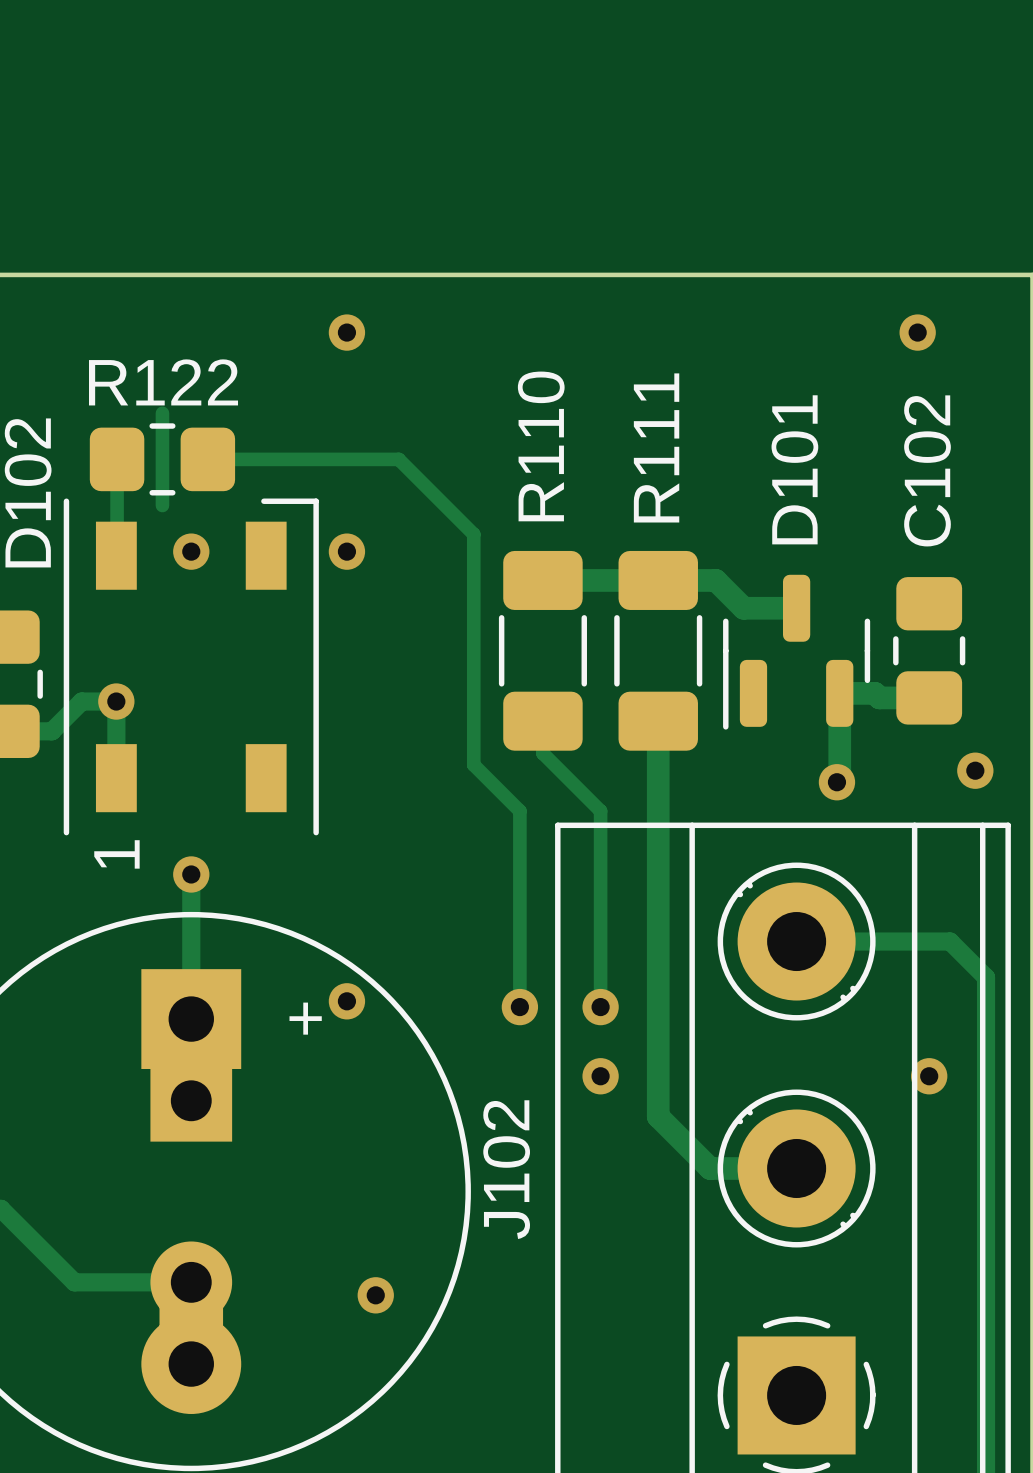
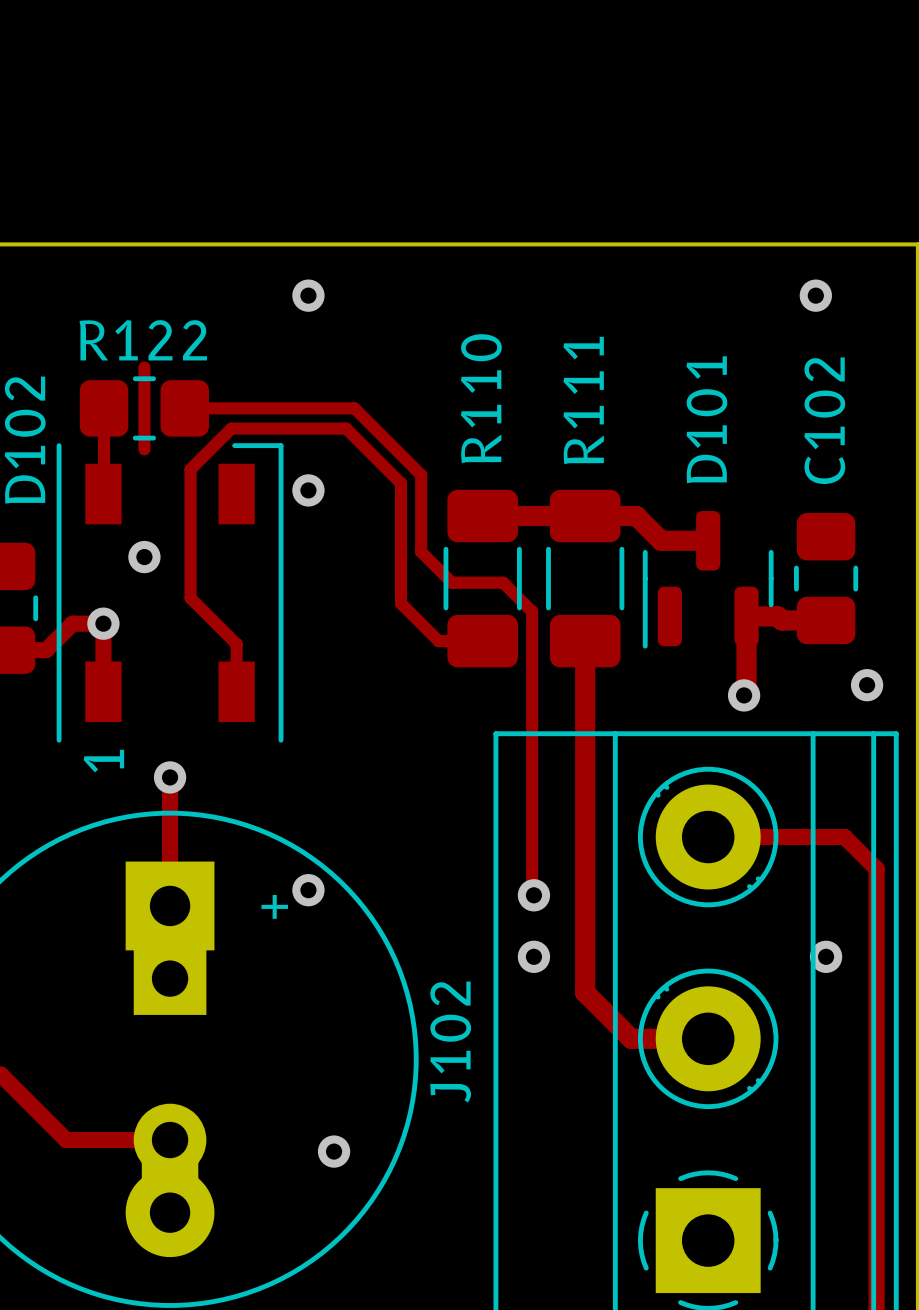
via position: (191, 551) -> (144, 557)
track: (473, 620) (473, 764) (519, 811) (519, 1007) -> (421, 551) (451, 582) (503, 582) (532, 611) (532, 893) (533, 895)
track: (542, 721) (542, 753) (600, 811) (600, 1007) -> (482, 641) (438, 641) (401, 603) (401, 483) (346, 428) (231, 428) (190, 469) (190, 598) (236, 644) (236, 691)
via: (519, 1007) -> none

